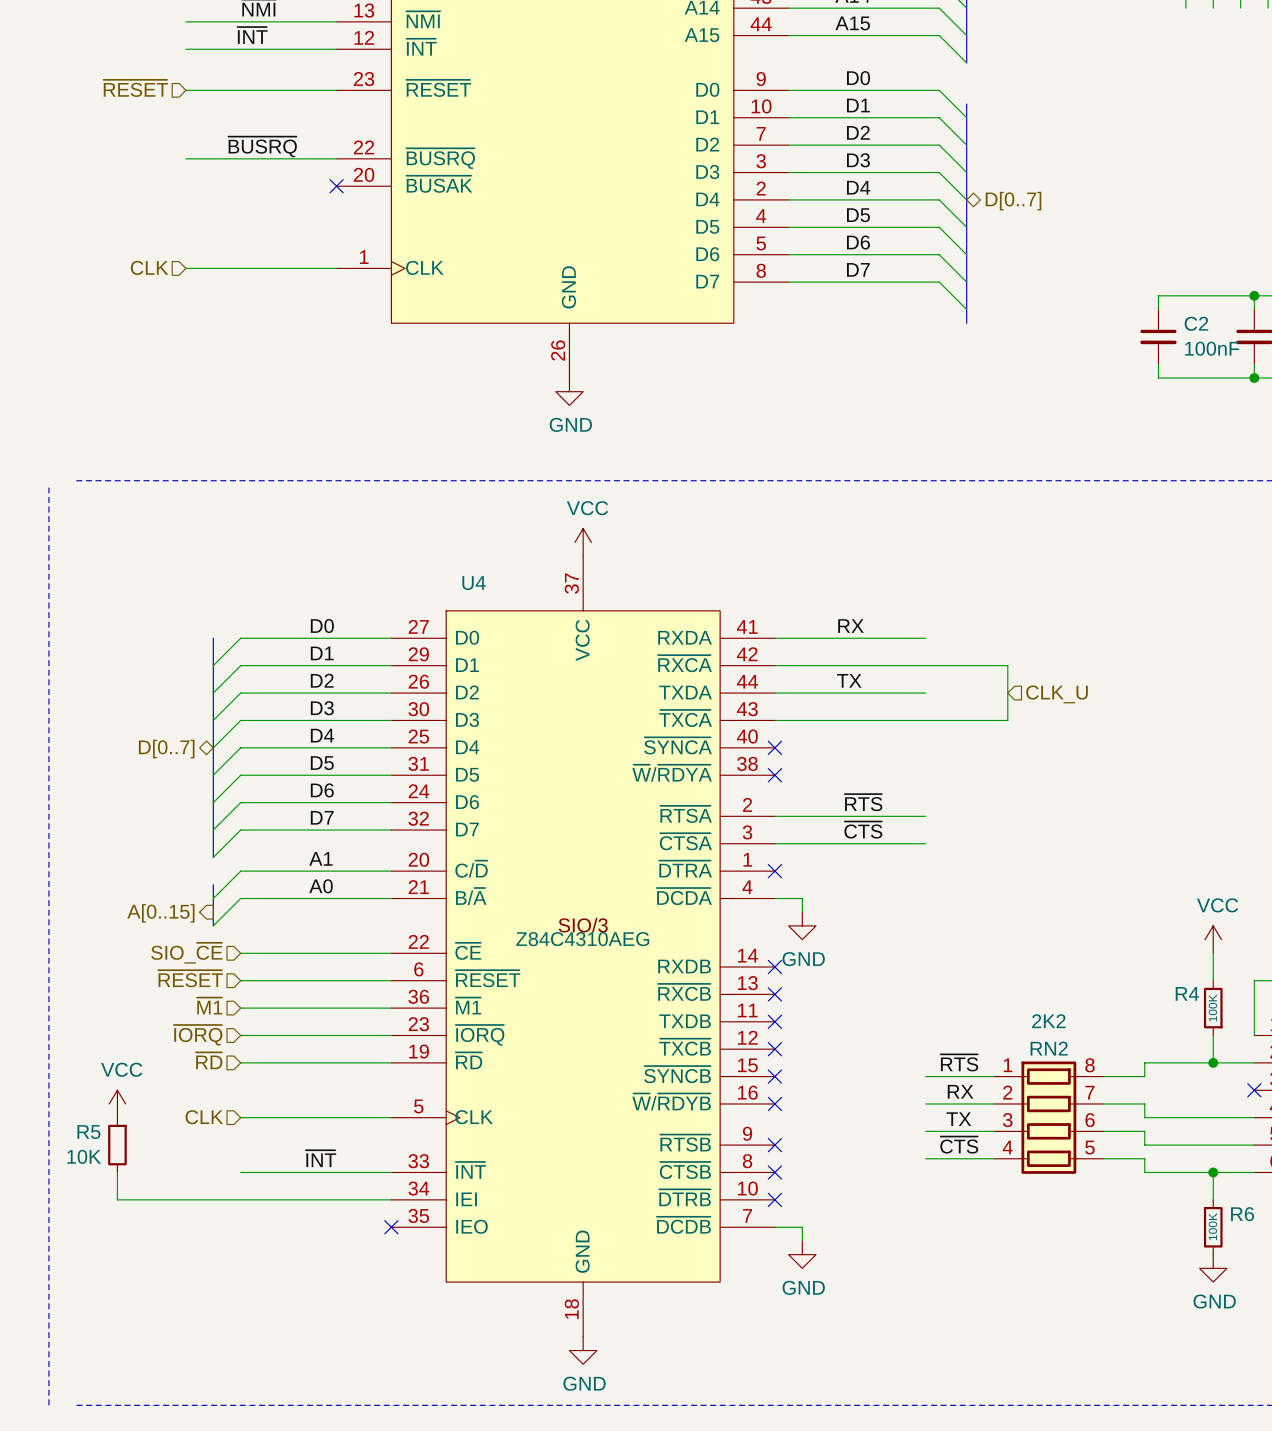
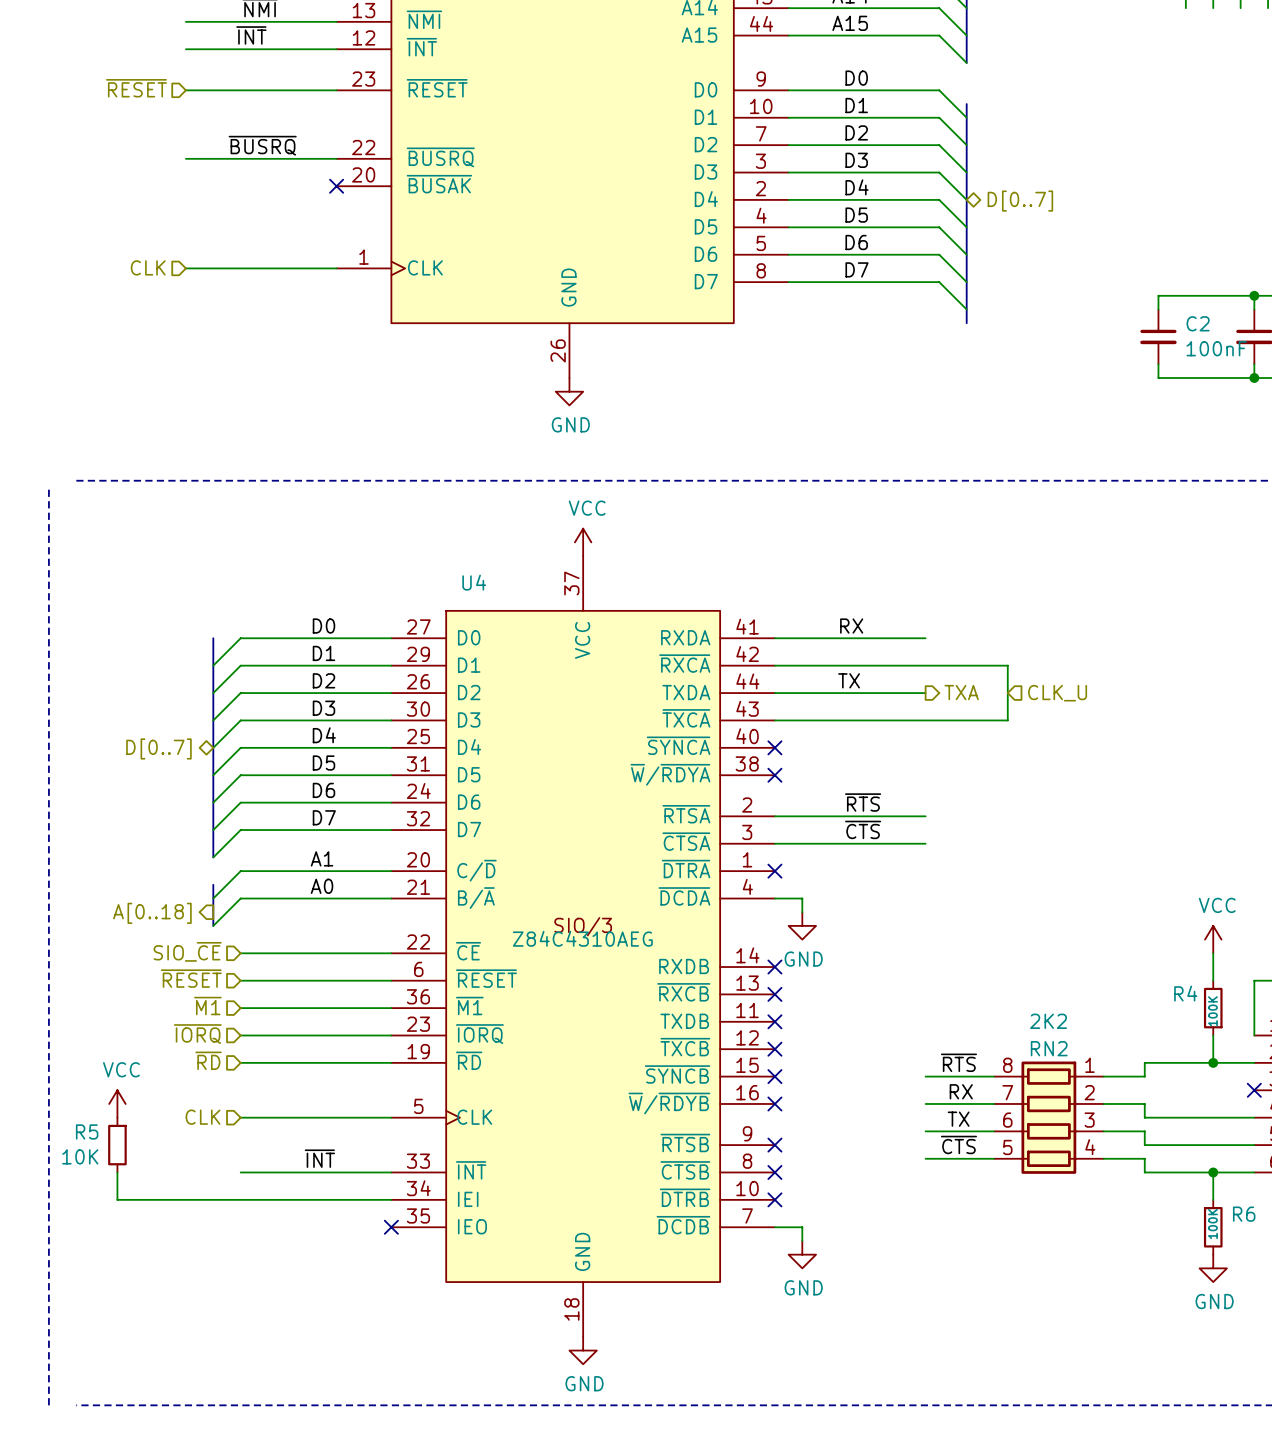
hierarchical label: none -> TXA (961, 692)
hierarchical label: A[0..15] (160, 913) -> A[0..18] (152, 913)
RN2 flip: as is (1048, 1117) -> left-right (1048, 1117)

